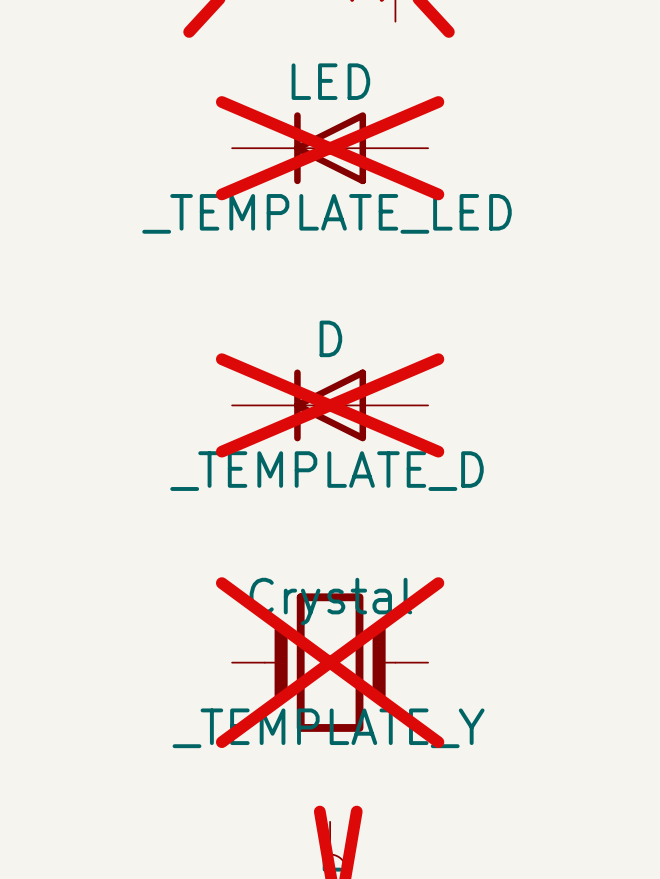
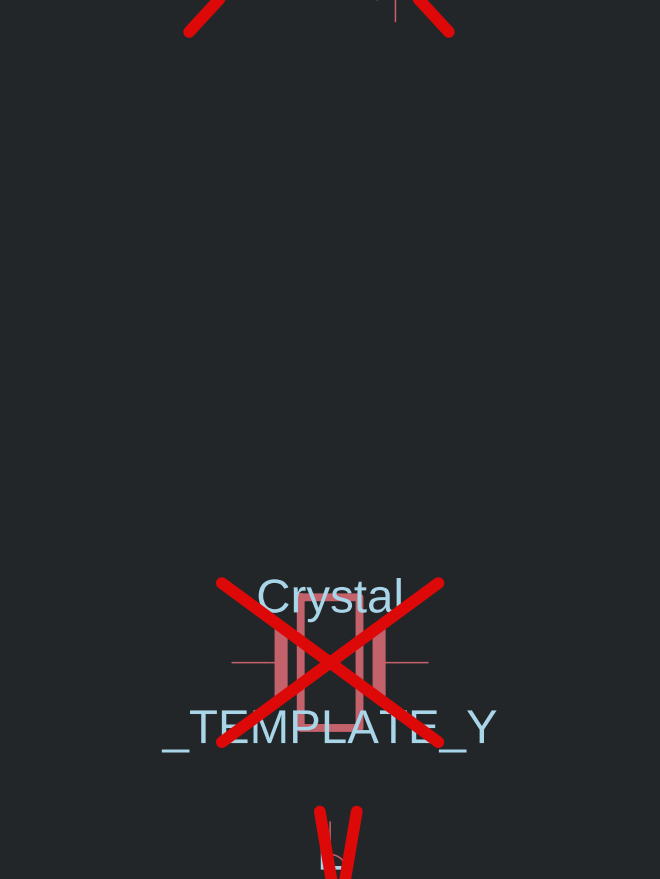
_TEMPLATE_LED: LED (330, 148) -> none
_TEMPLATE_D: D (330, 405) -> none

